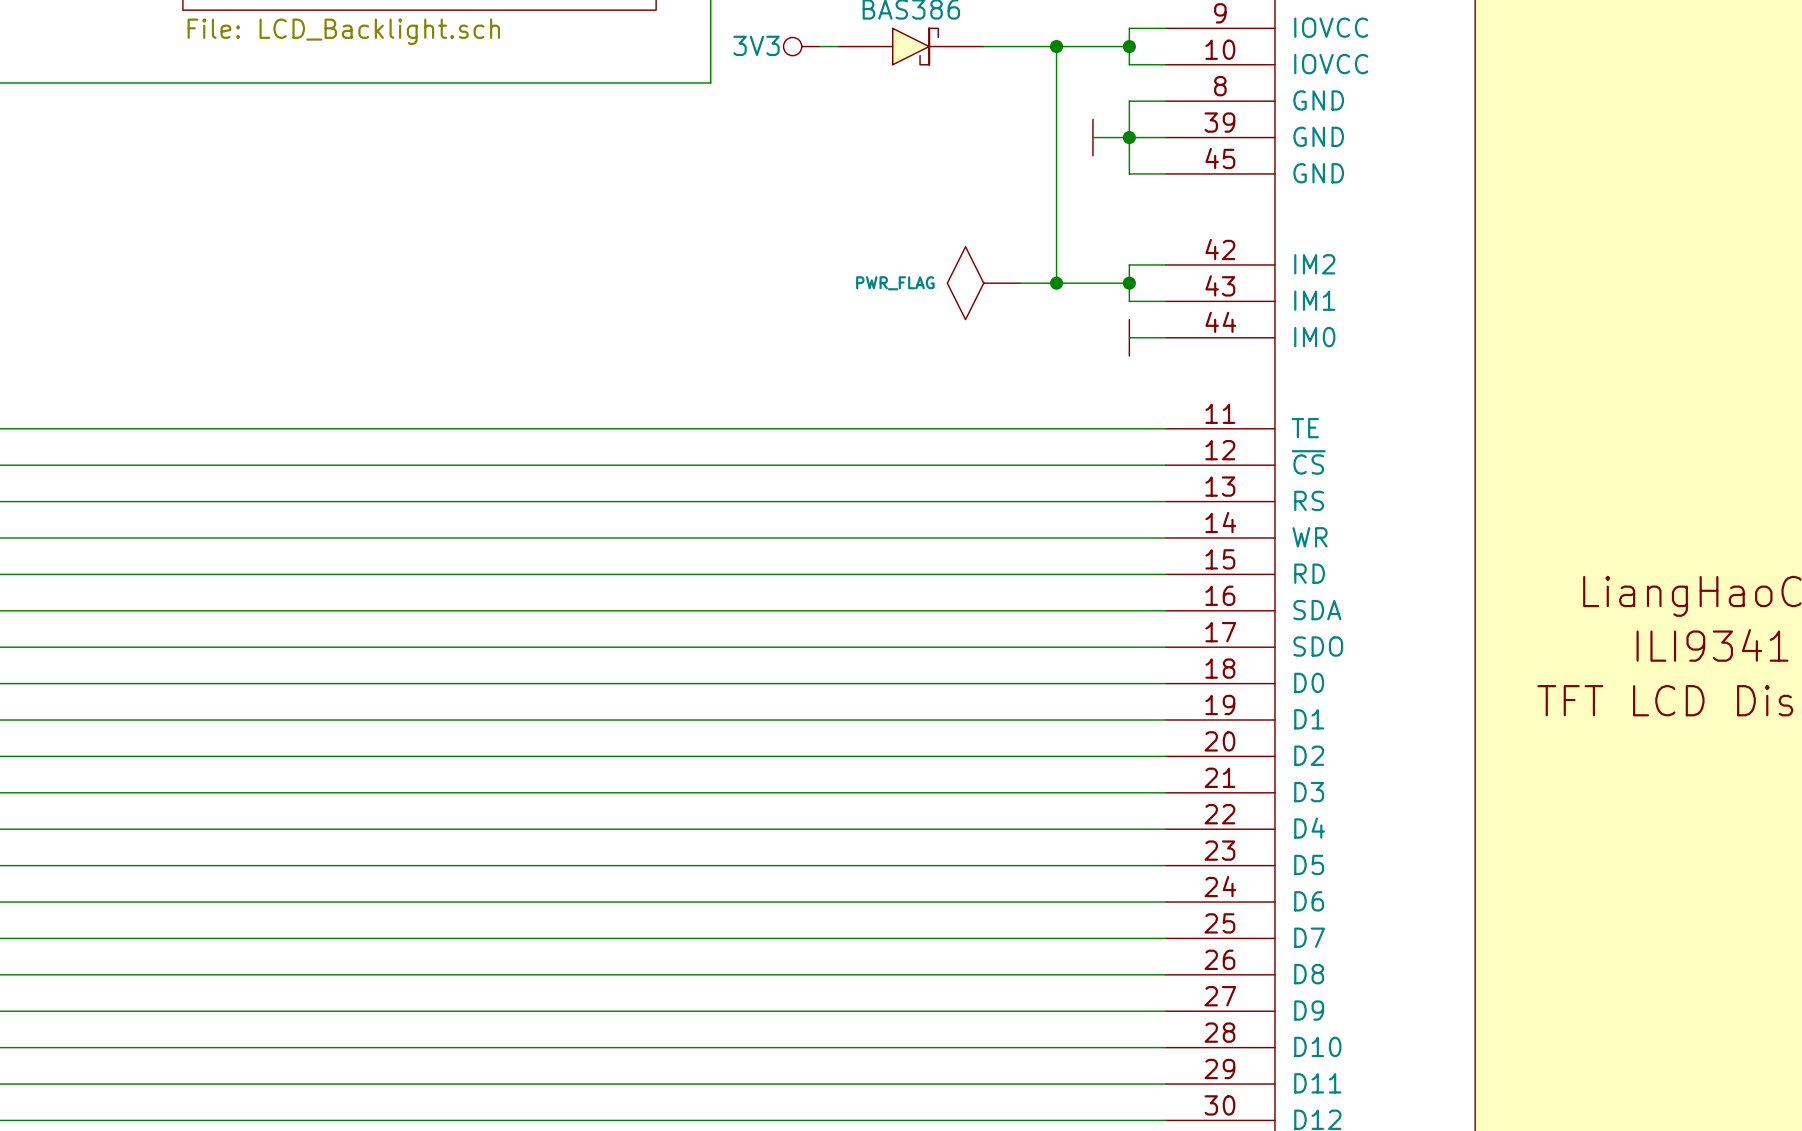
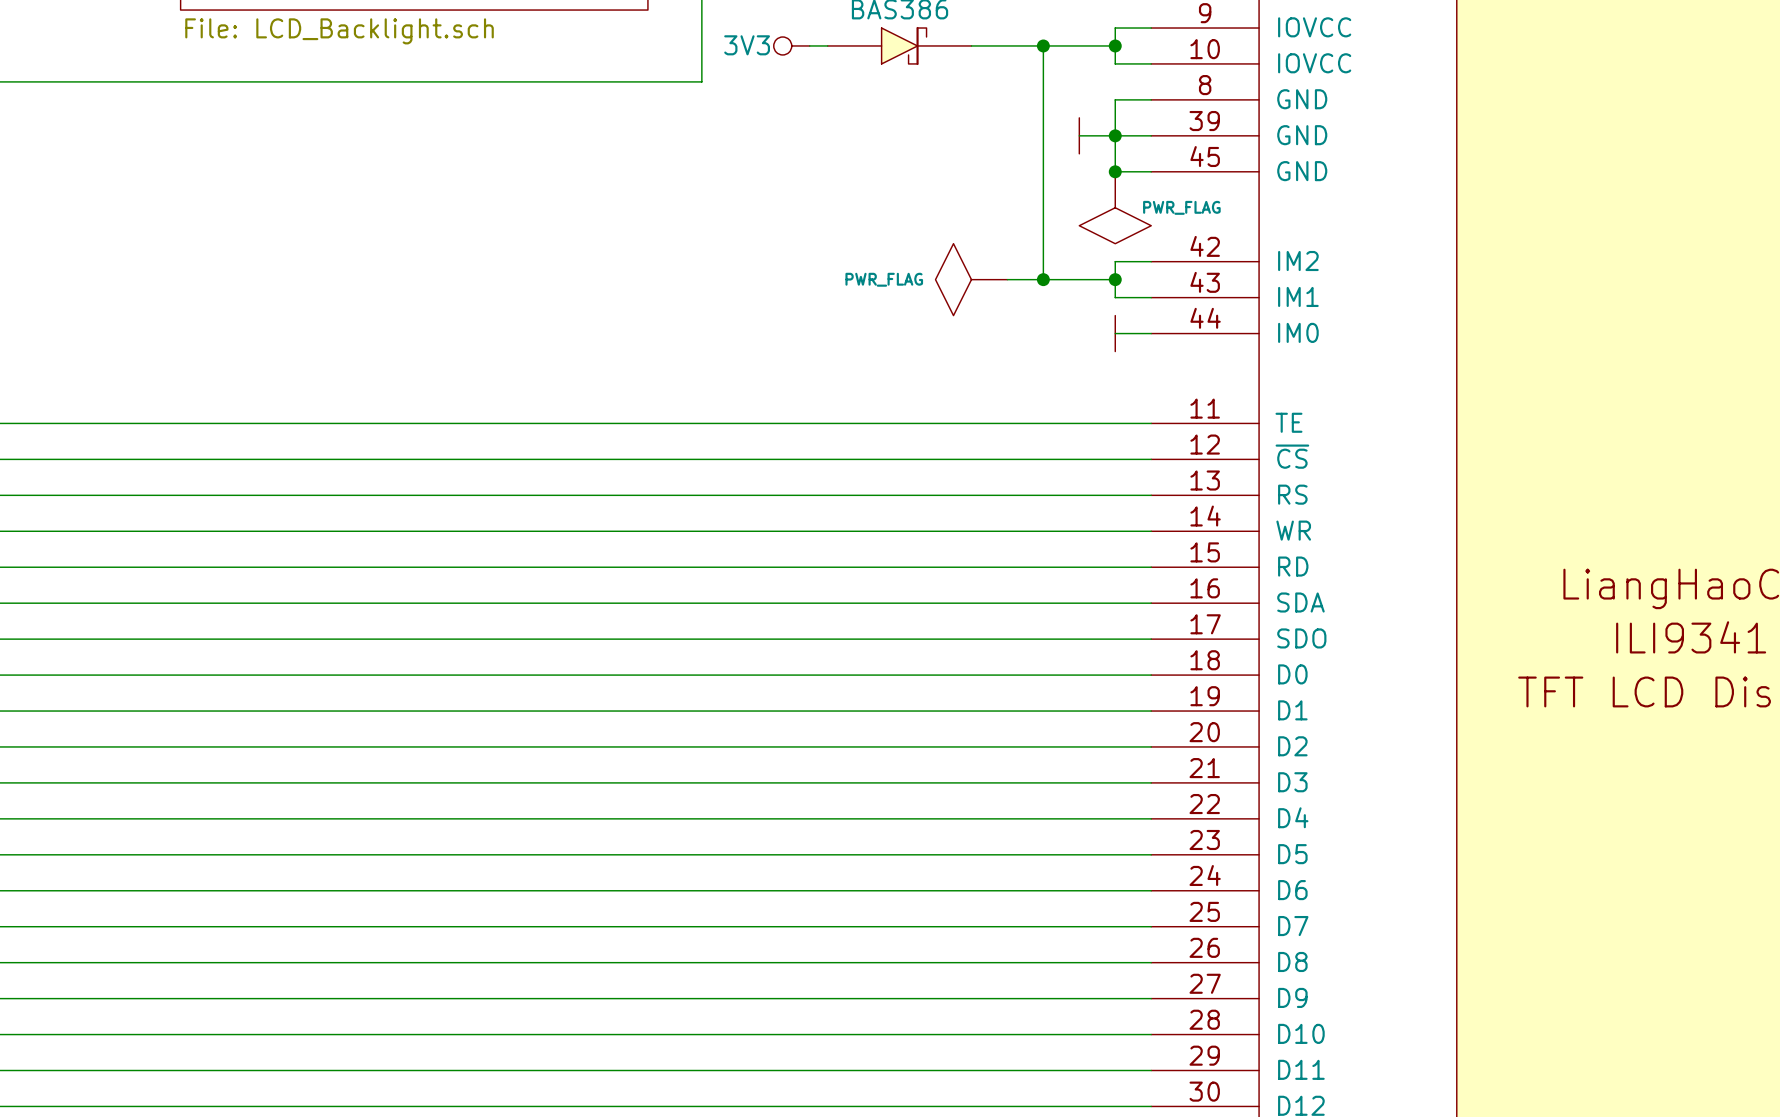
junction: none -> (1115, 171)
power symbol: none -> PWR_FLAG (1115, 207)

